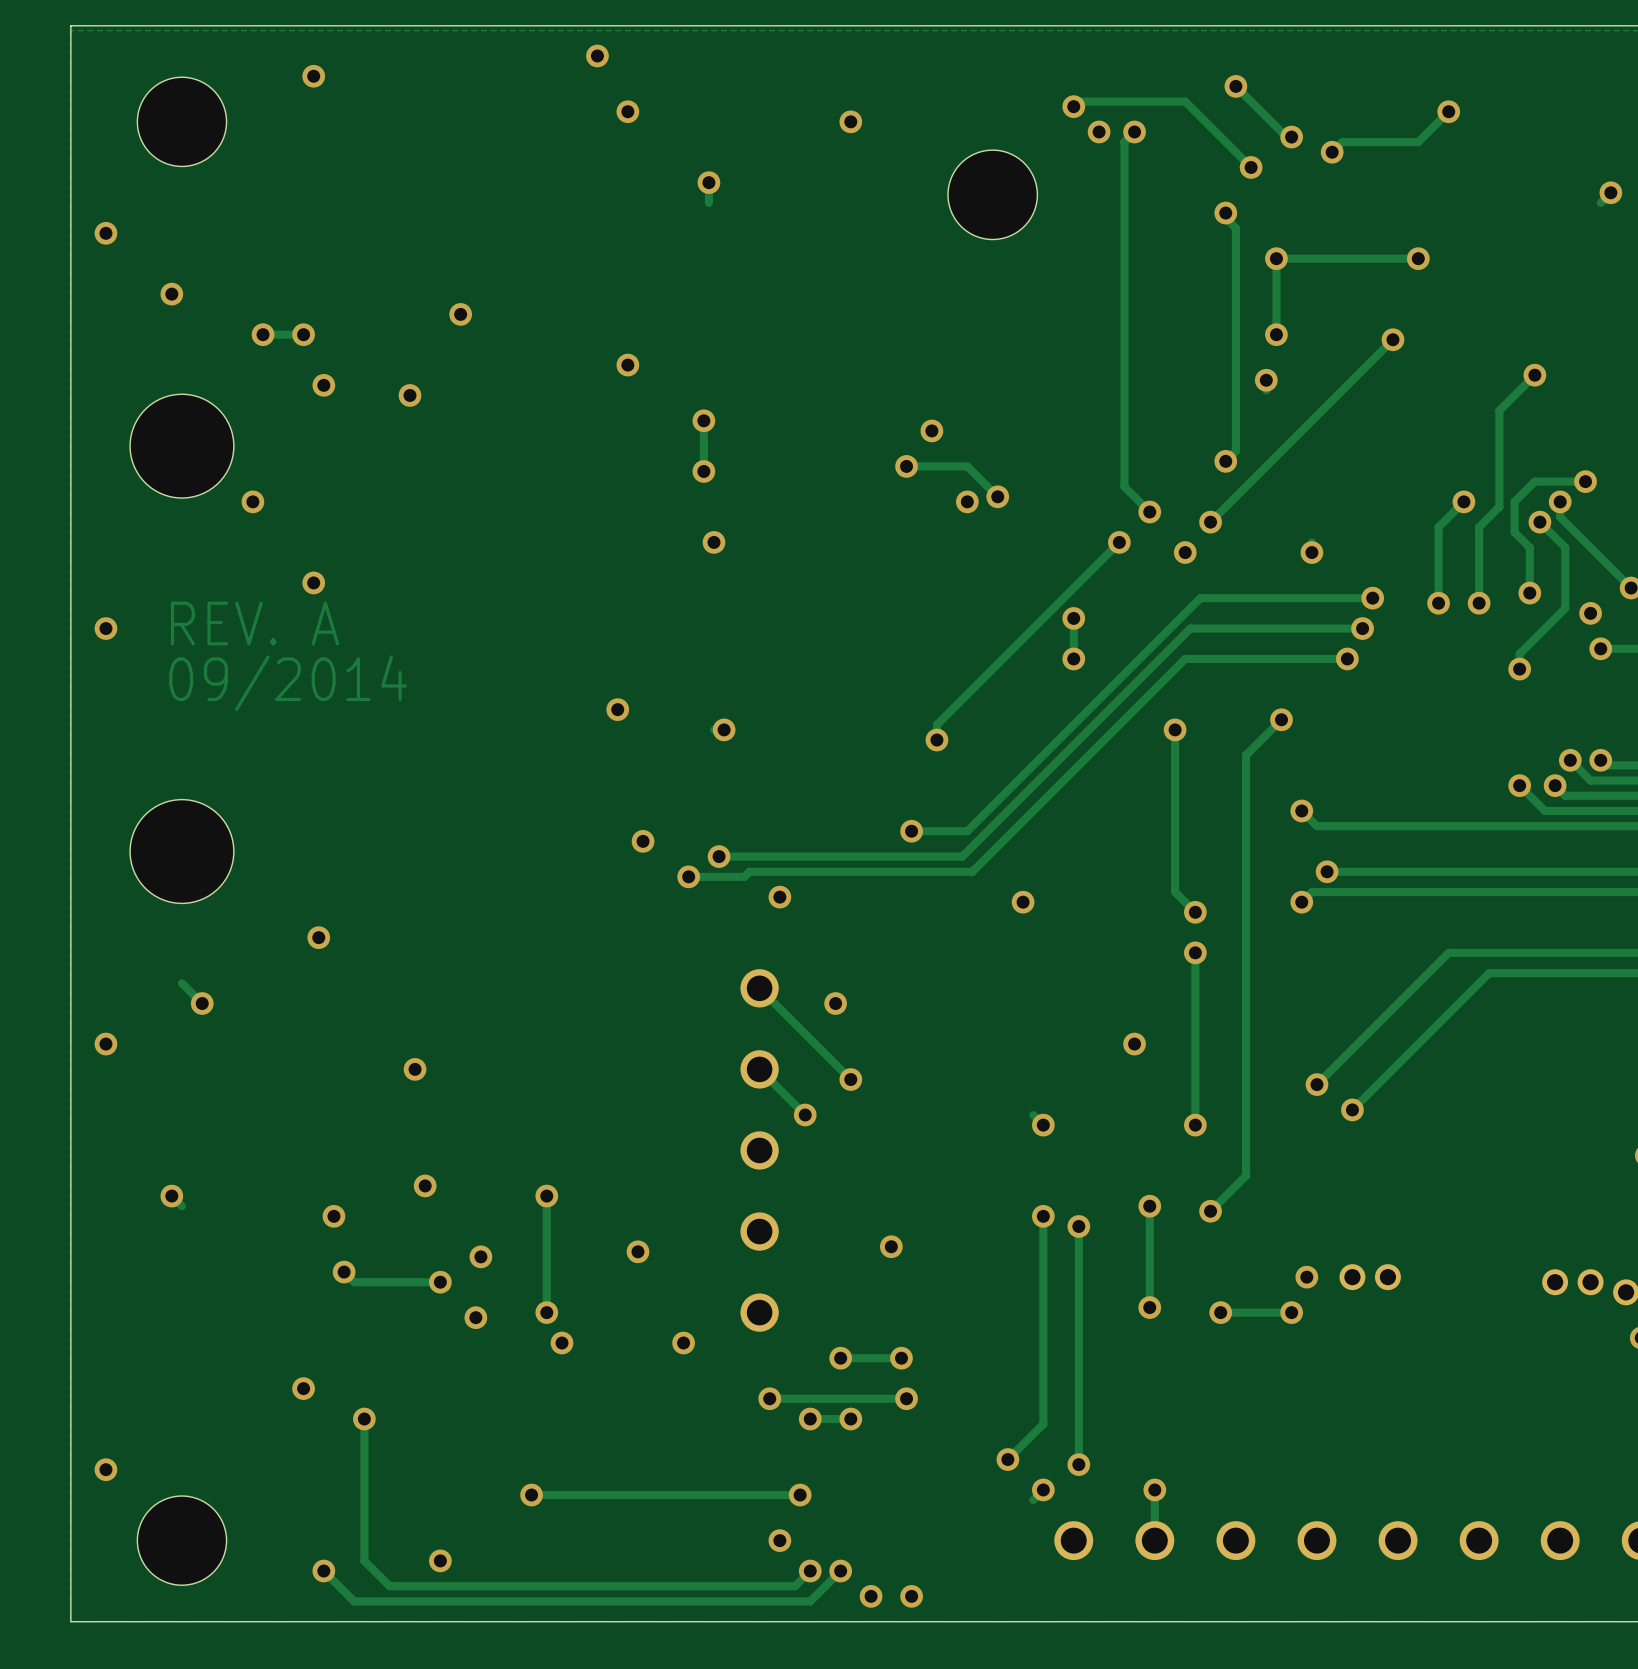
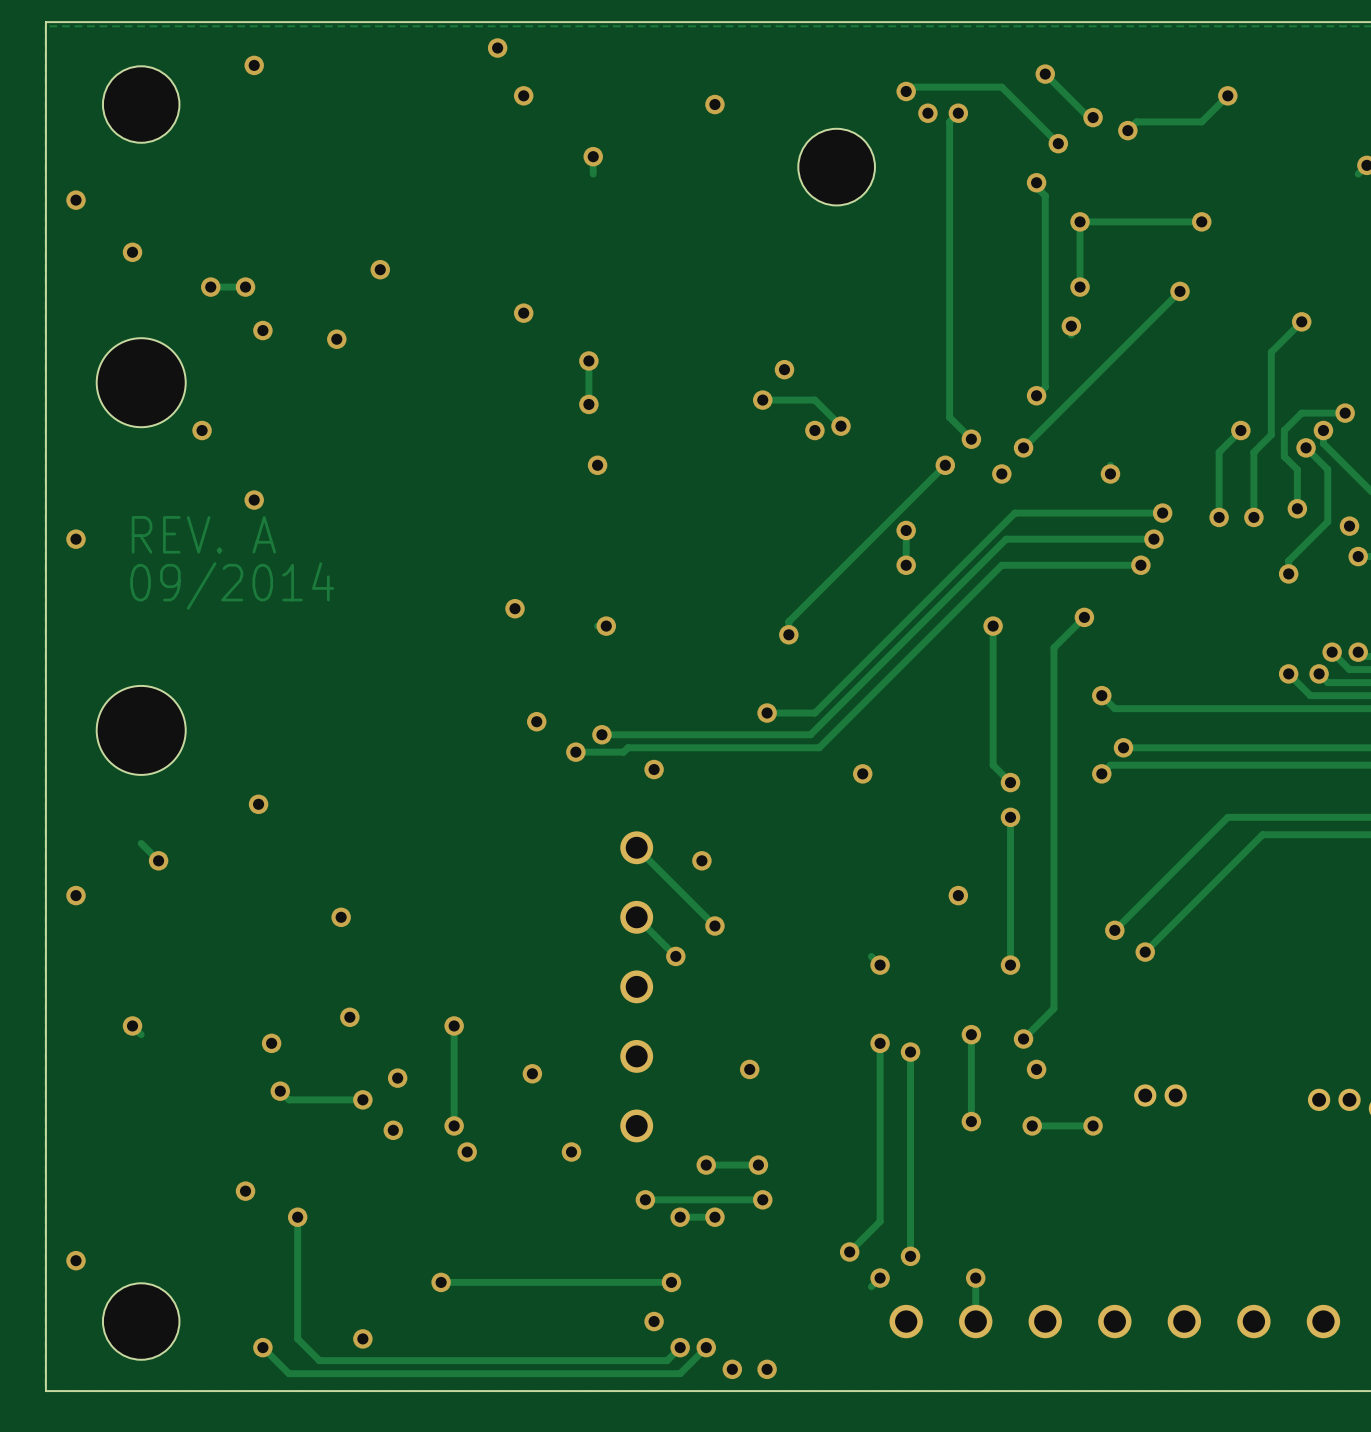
via position: (1306, 1277) -> (1036, 1069)

